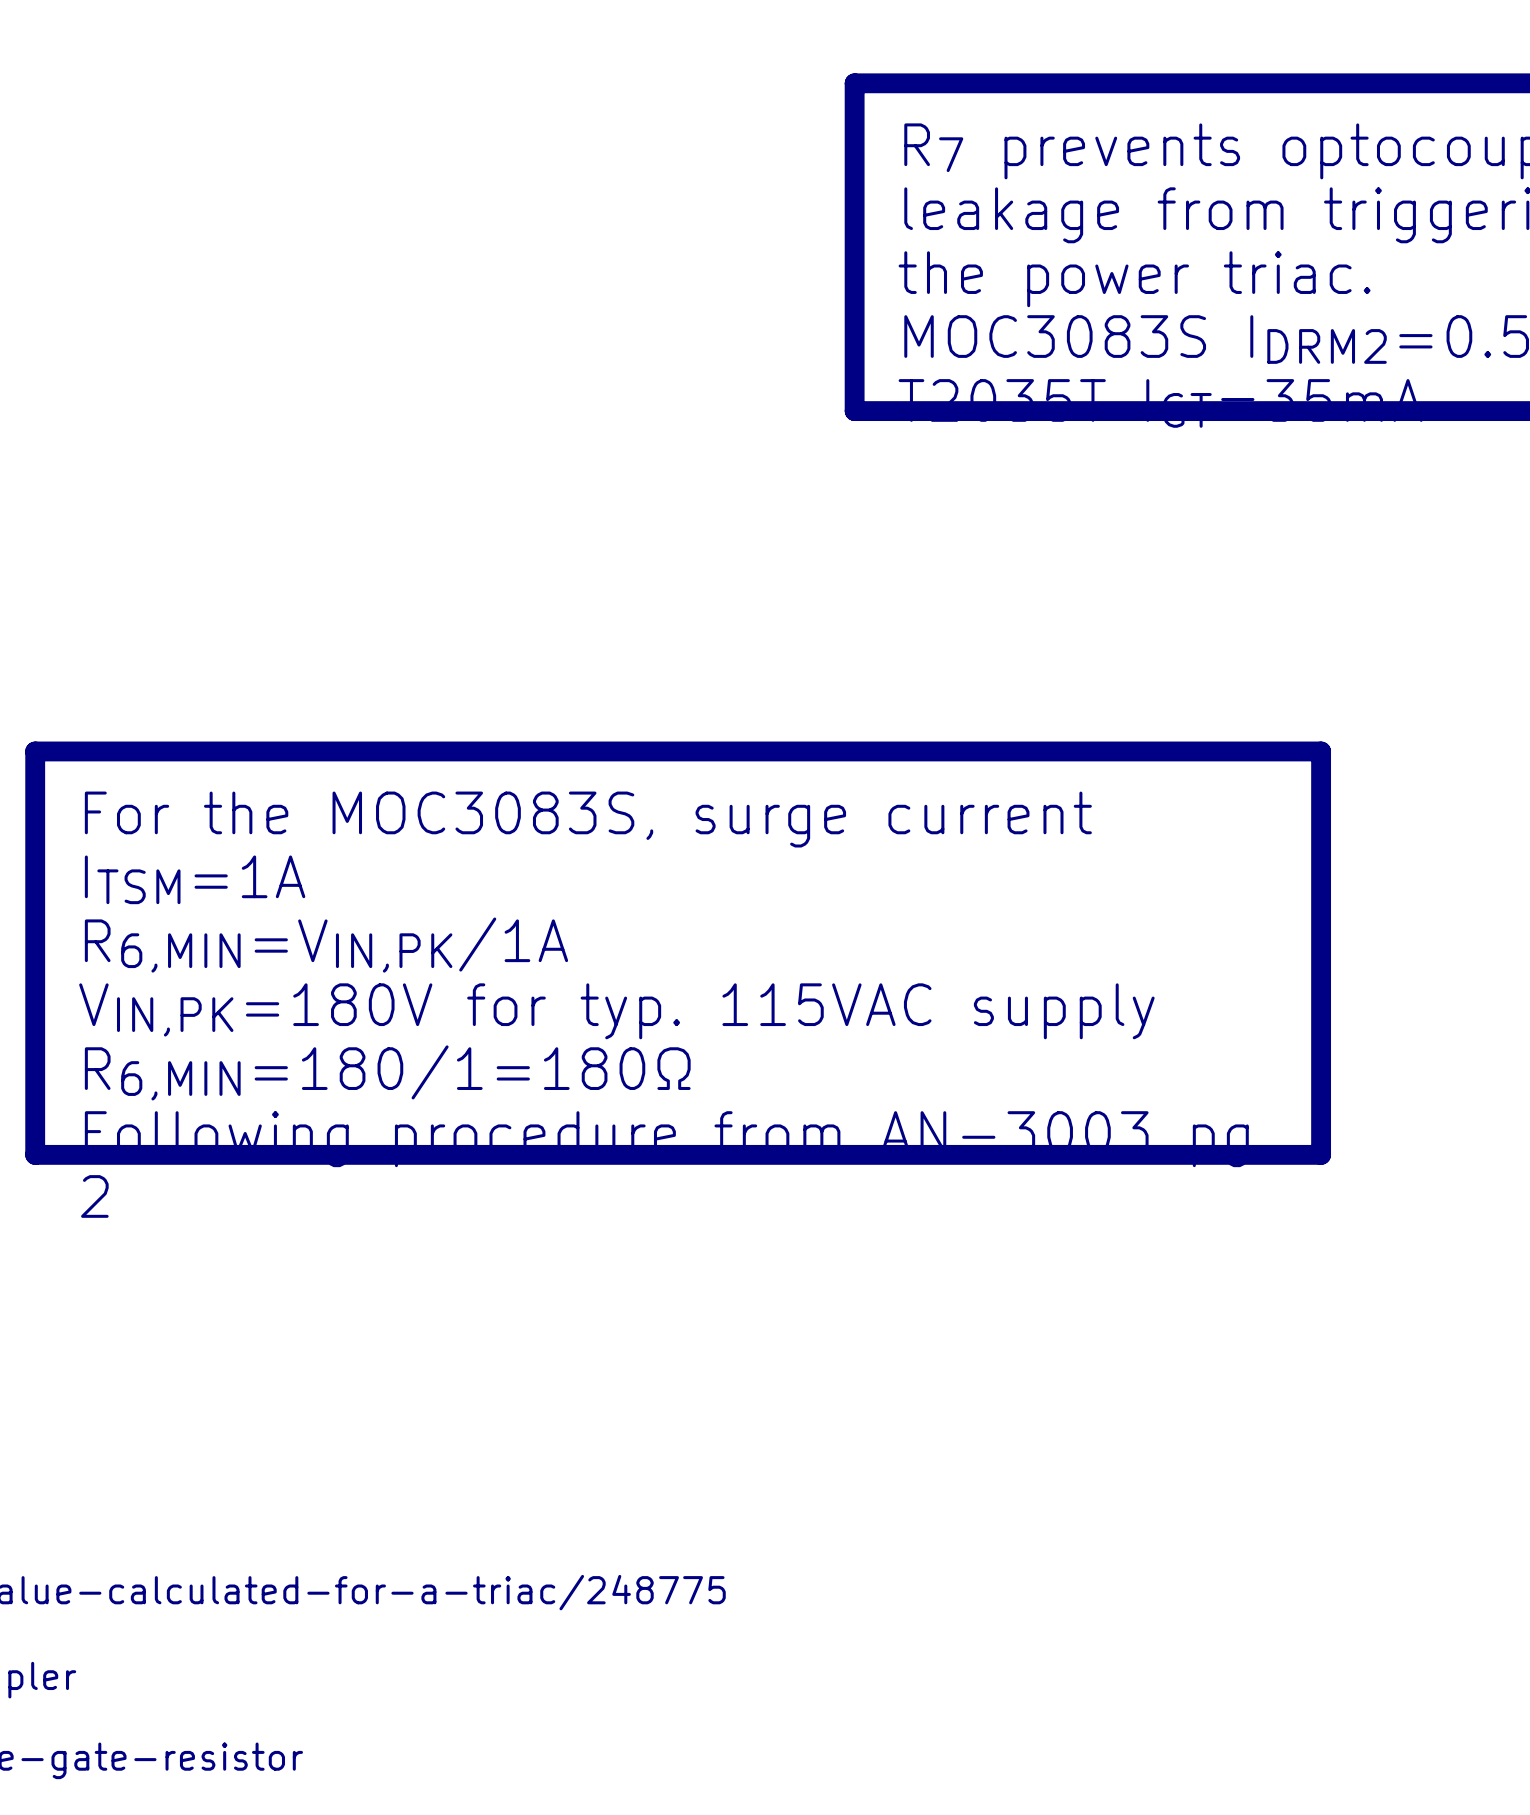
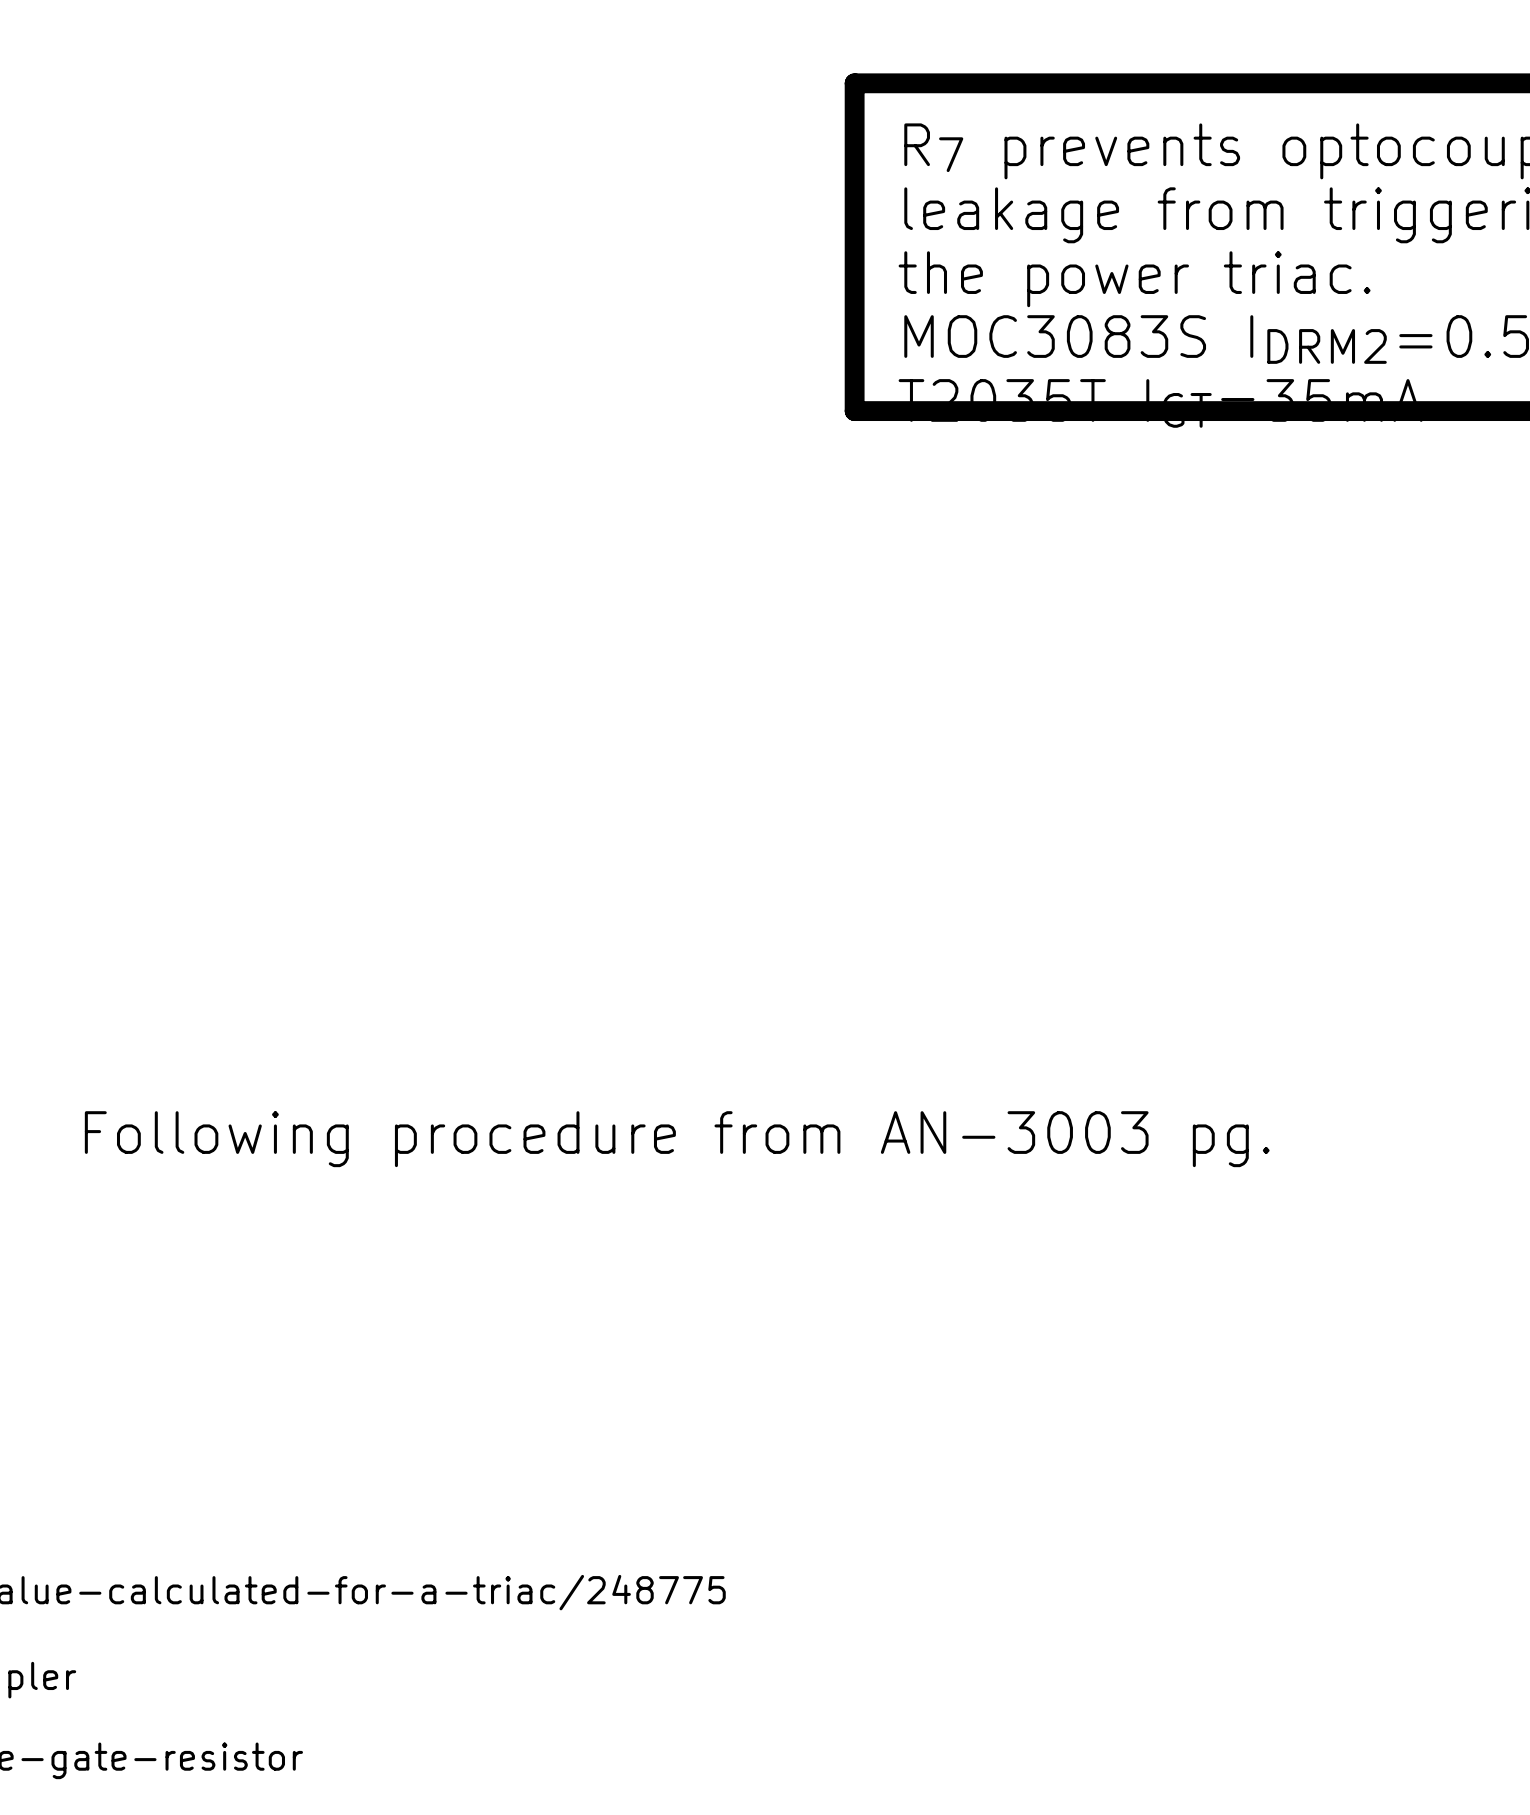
line: (35, 751) (1321, 751) (1321, 1154) (35, 1154) (35, 751) -> none
text: For the MOC3083S, surge current (588, 819) -> none
text: ITSM=1A (195, 879) -> none
text: R6,MIN=VIN,PK/1A (326, 945) -> none
text: VIN,PK=180V for typ. 115VAC supply (616, 1011) -> none
text: R6,MIN=180/1=180Ω (387, 1072) -> none
text: 2 (94, 1196) -> none

